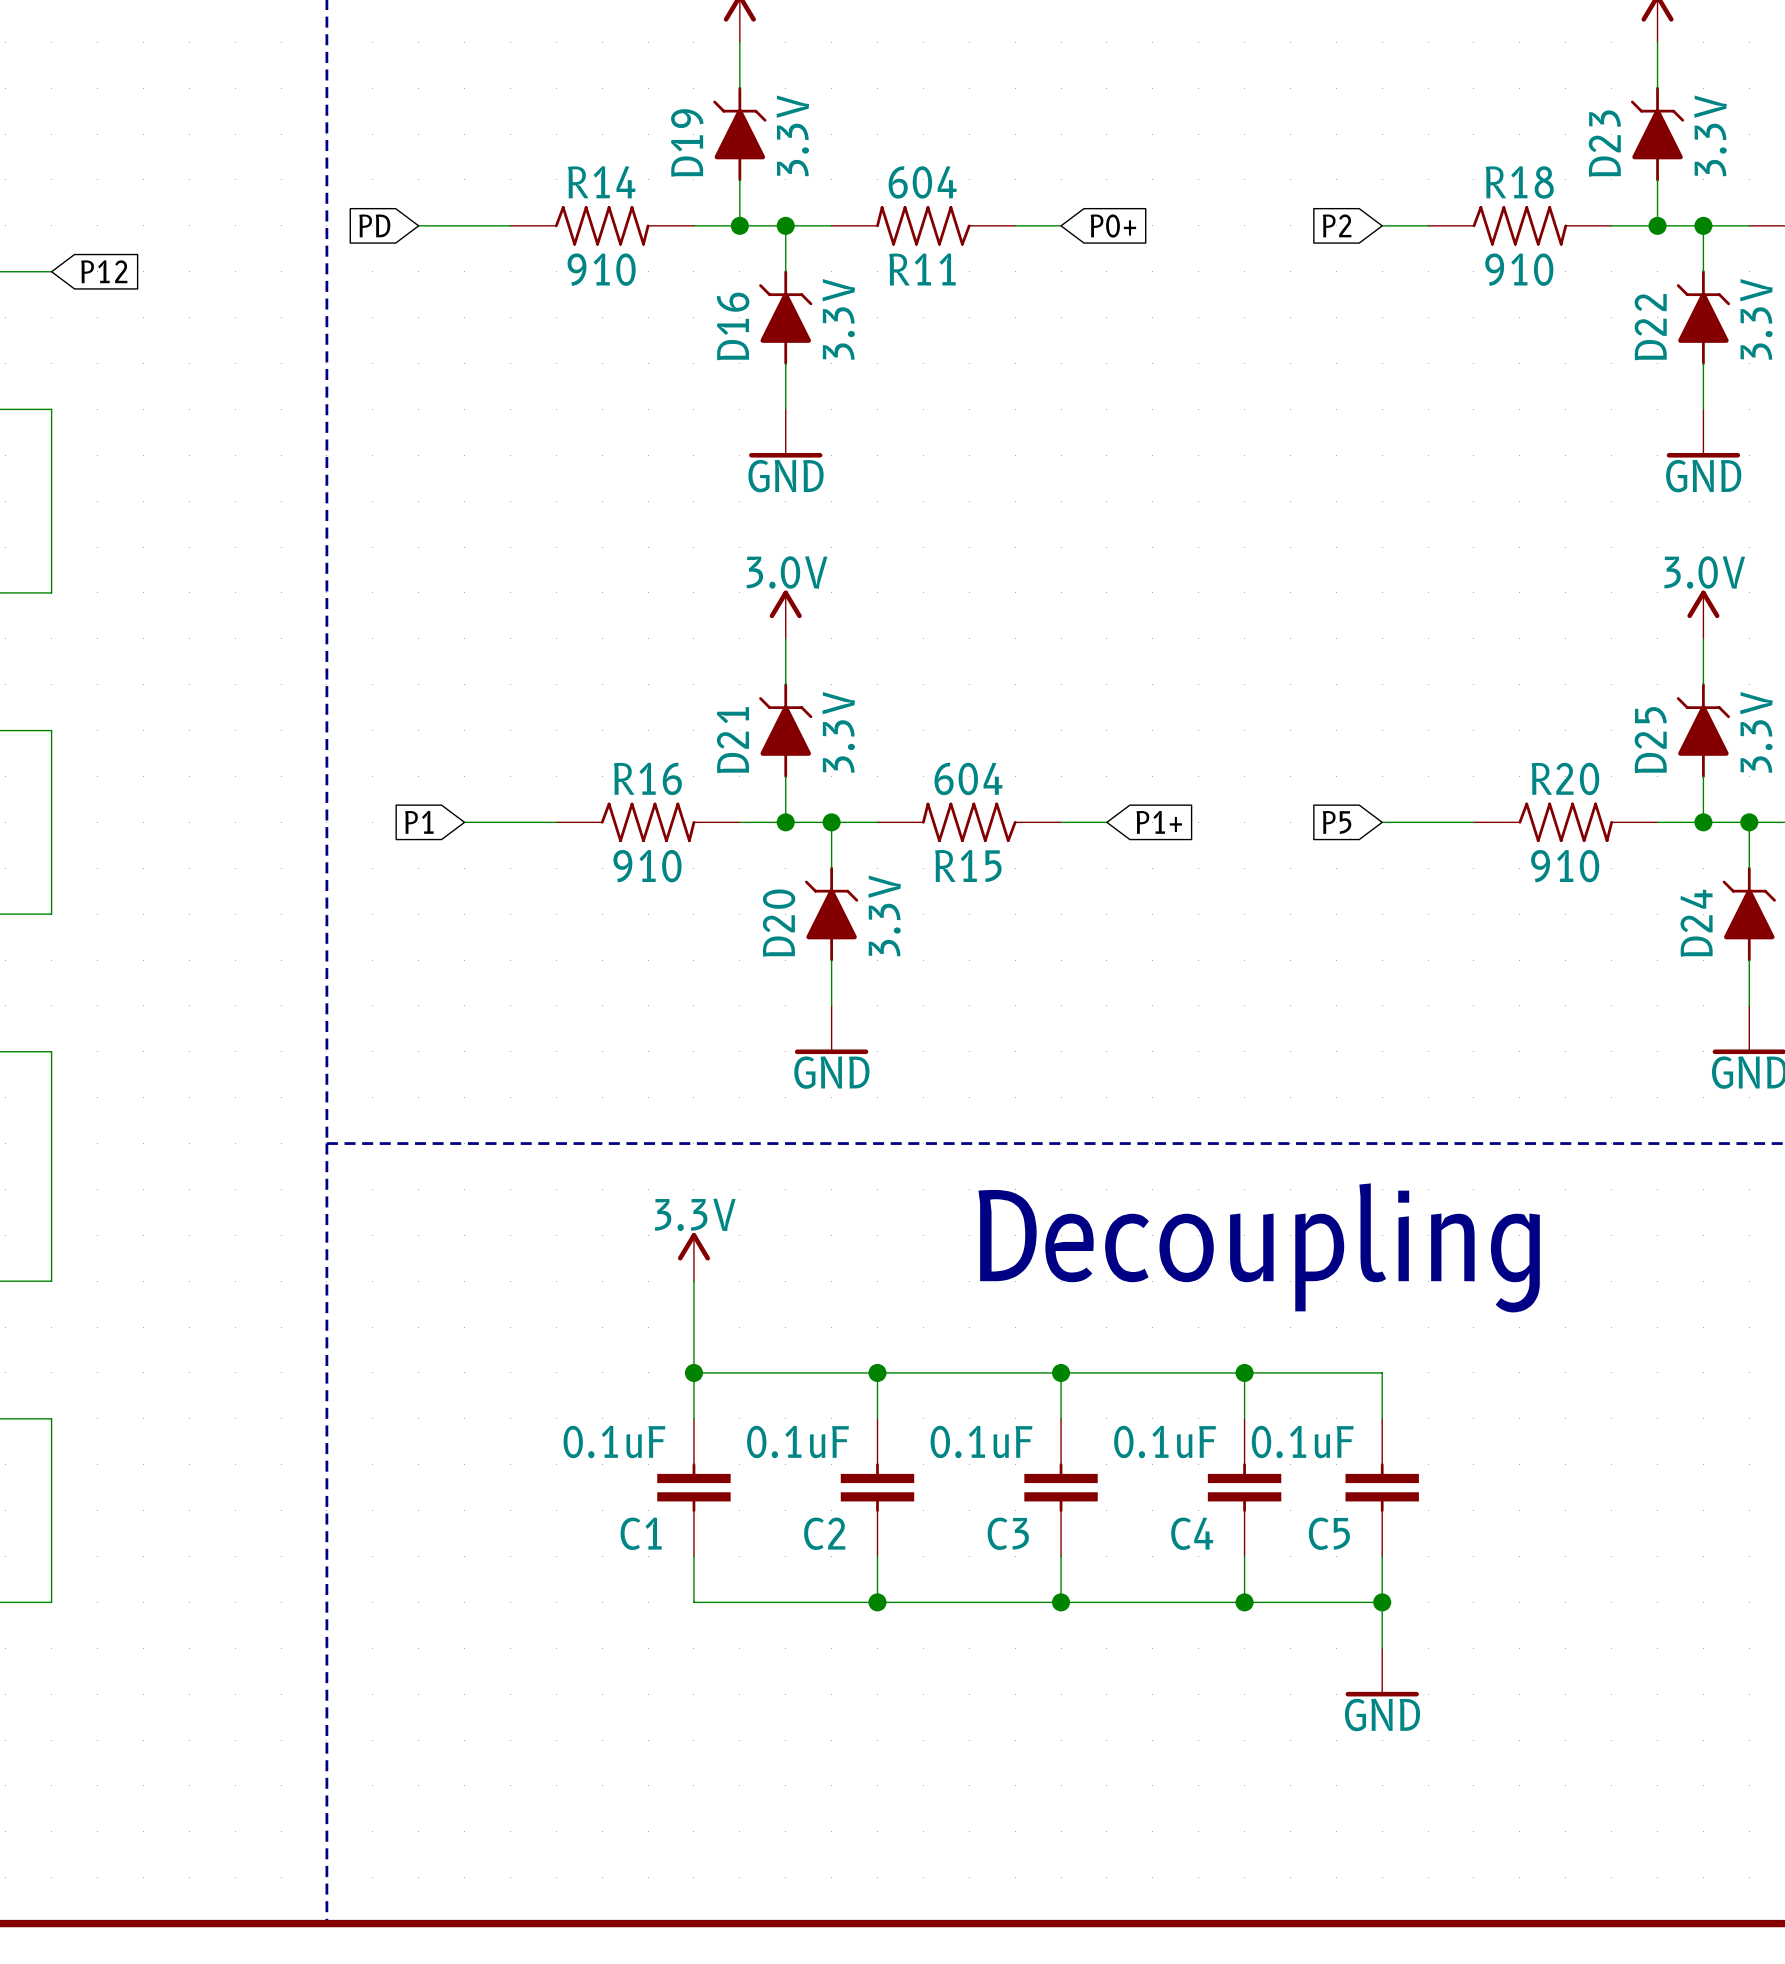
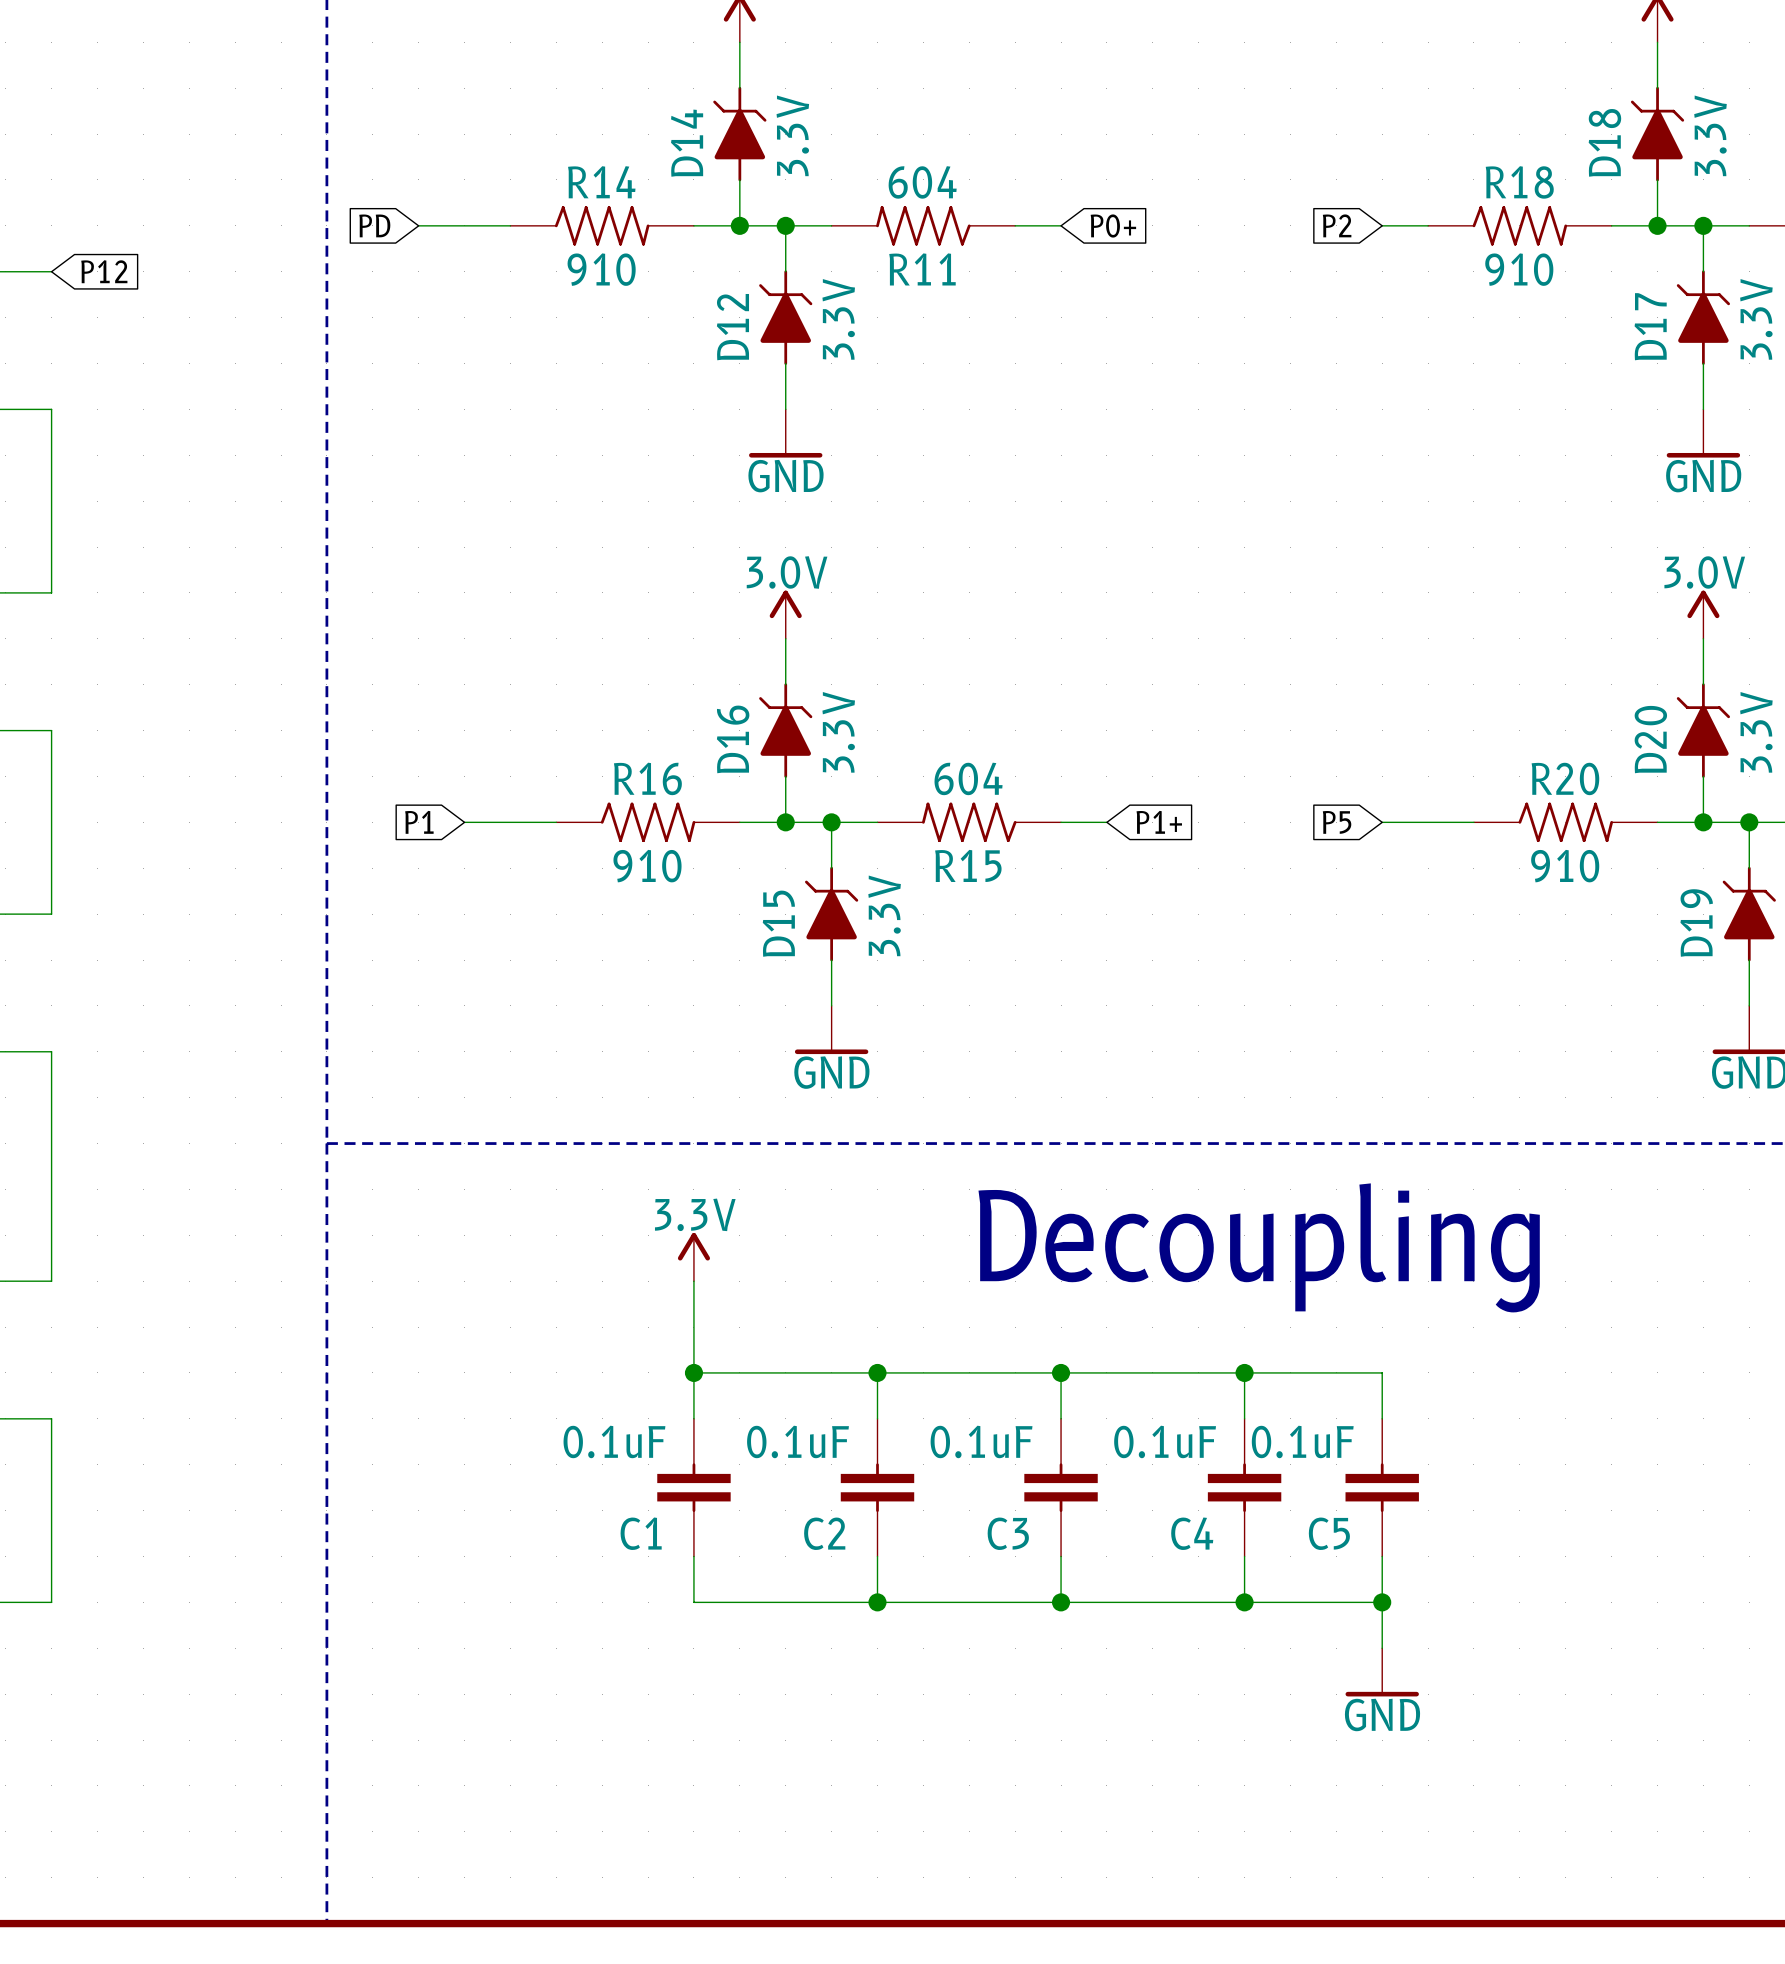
D19 name: D19 (687, 142) -> D14 (687, 143)
D23 name: D23 (1604, 143) -> D18 (1604, 142)
D16 name: D16 (733, 326) -> D12 (732, 327)
D22 name: D22 (1650, 327) -> D17 (1650, 326)
D21 name: D21 (732, 740) -> D16 (733, 739)
D25 name: D25 (1650, 740) -> D20 (1650, 739)
D20 name: D20 (779, 923) -> D15 (778, 923)
D24 name: D24 (1696, 923) -> D19 (1696, 922)

